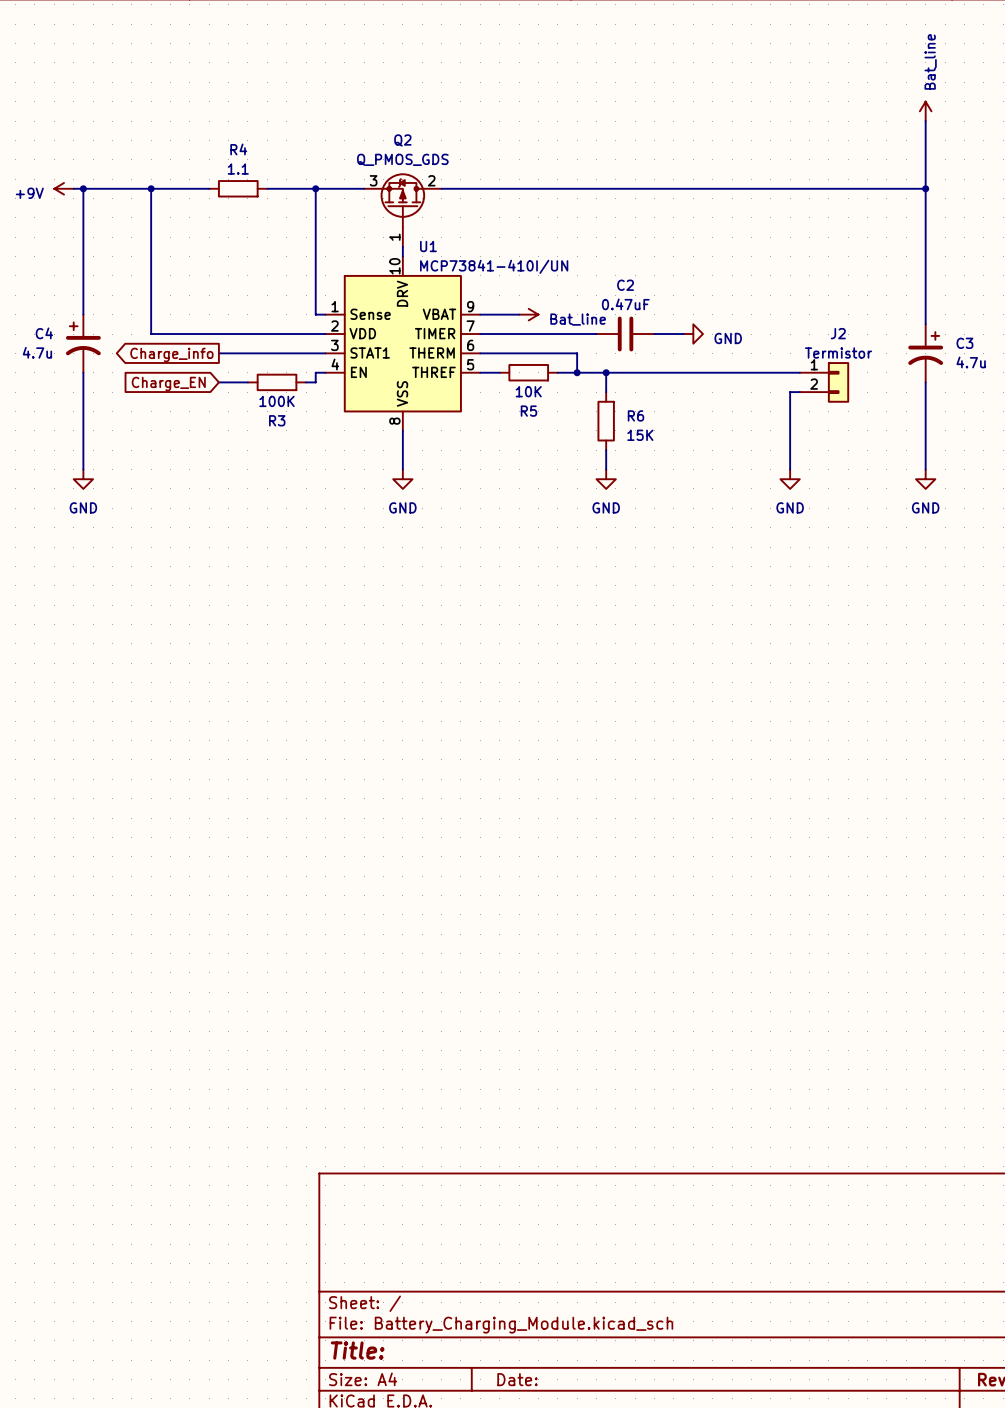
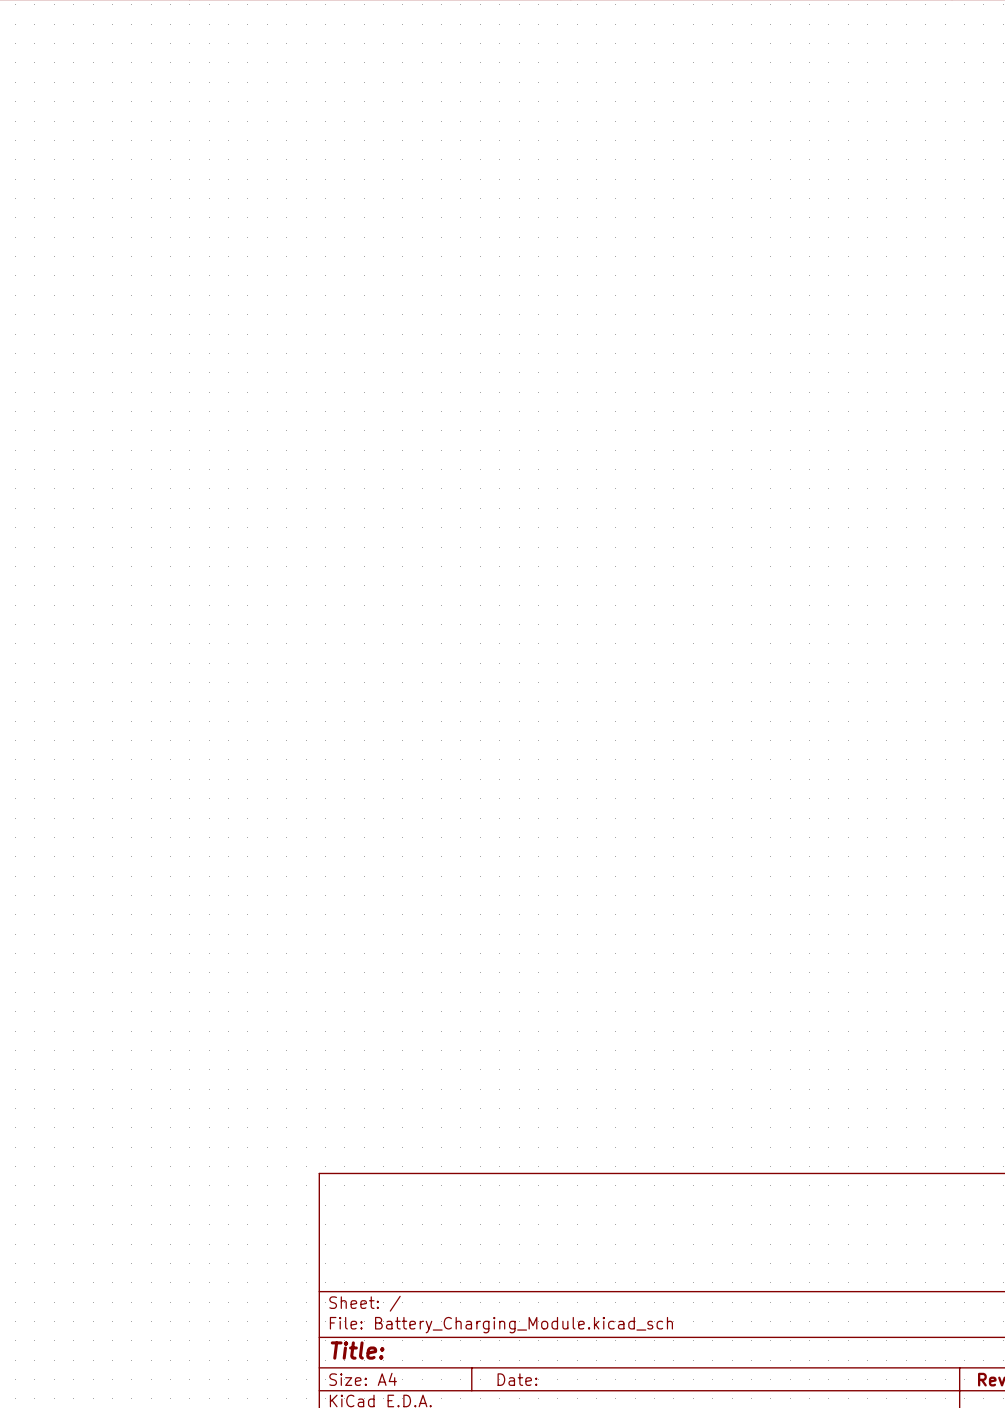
power symbol: Bat_line (925, 111) -> none
wire: (925, 121) (925, 324) -> none
power symbol: +9V (64, 188) -> none
wire: (73, 188) (209, 188) -> none
wire: (83, 188) (83, 314) -> none
junction: (83, 188) -> none
wire: (151, 188) (151, 334) (325, 334) -> none
junction: (151, 188) -> none
R4: 1.1 (238, 188) -> none
wire: (267, 188) (364, 188) -> none
wire: (315, 188) (315, 314) (325, 314) -> none
junction: (315, 188) -> none
wire: (441, 188) (925, 188) -> none
junction: (925, 188) -> none
Q2: Q_PMOS_GDS (402, 210) -> none
wire: (402, 246) (402, 256) -> none
wire: (480, 314) (519, 314) -> none
power symbol: Bat_line (528, 314) -> none
wire: (480, 334) (596, 334) -> none
C2: 0.47uF (625, 334) -> none
wire: (654, 334) (683, 334) -> none
power symbol: GND (693, 334) -> none
C4: 4.7u (83, 343) -> none
U1: MCP73841-410I/UN (402, 343) -> none
wire: (218, 353) (325, 353) -> none
wire: (480, 353) (577, 353) (577, 372) -> none
C3: 4.7u (925, 353) -> none
global label: Charge_info (171, 354) -> none
wire: (83, 372) (83, 469) -> none
wire: (325, 372) (315, 372) (315, 382) (306, 382) -> none
wire: (480, 372) (499, 372) -> none
R5: 10K (528, 372) -> none
wire: (557, 372) (799, 372) -> none
junction: (577, 372) -> none
wire: (606, 372) (606, 392) -> none
junction: (606, 372) -> none
wire: (218, 382) (247, 382) -> none
R3: 100K (277, 382) -> none
J2: Termistor (824, 382) -> none
wire: (925, 382) (925, 469) -> none
global label: Charge_EN (168, 384) -> none
wire: (799, 392) (790, 392) (790, 469) -> none
R6: 15K (606, 421) -> none
wire: (402, 430) (402, 469) -> none
wire: (606, 450) (606, 469) -> none
power symbol: GND (83, 479) -> none
power symbol: GND (402, 479) -> none
power symbol: GND (606, 479) -> none
power symbol: GND (790, 479) -> none
power symbol: GND (925, 479) -> none

